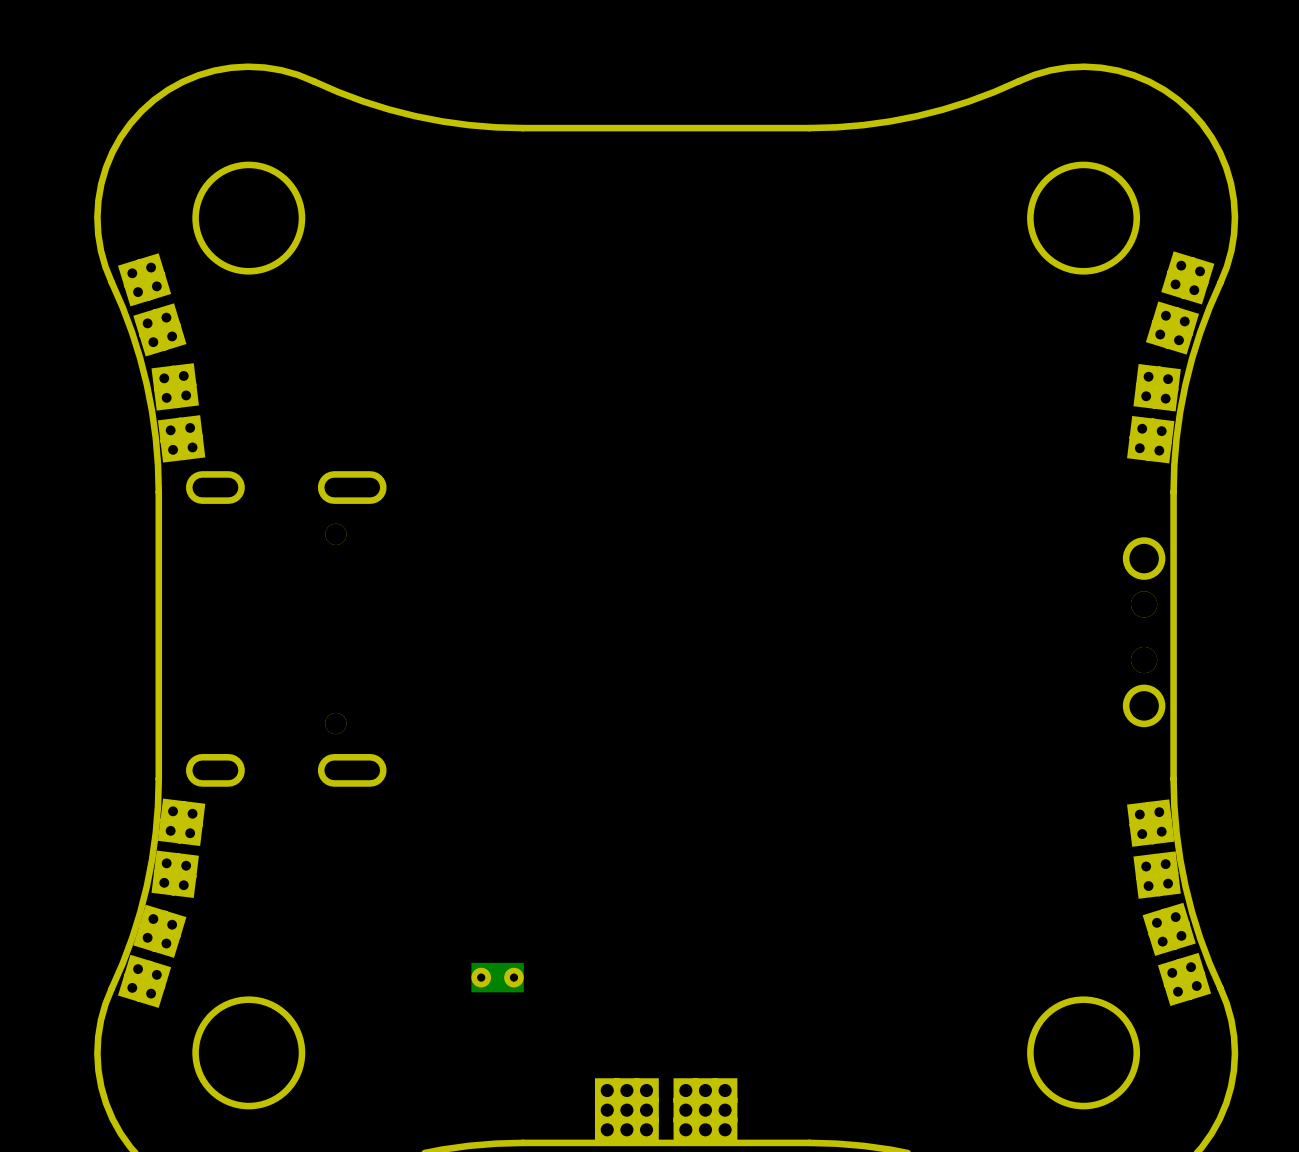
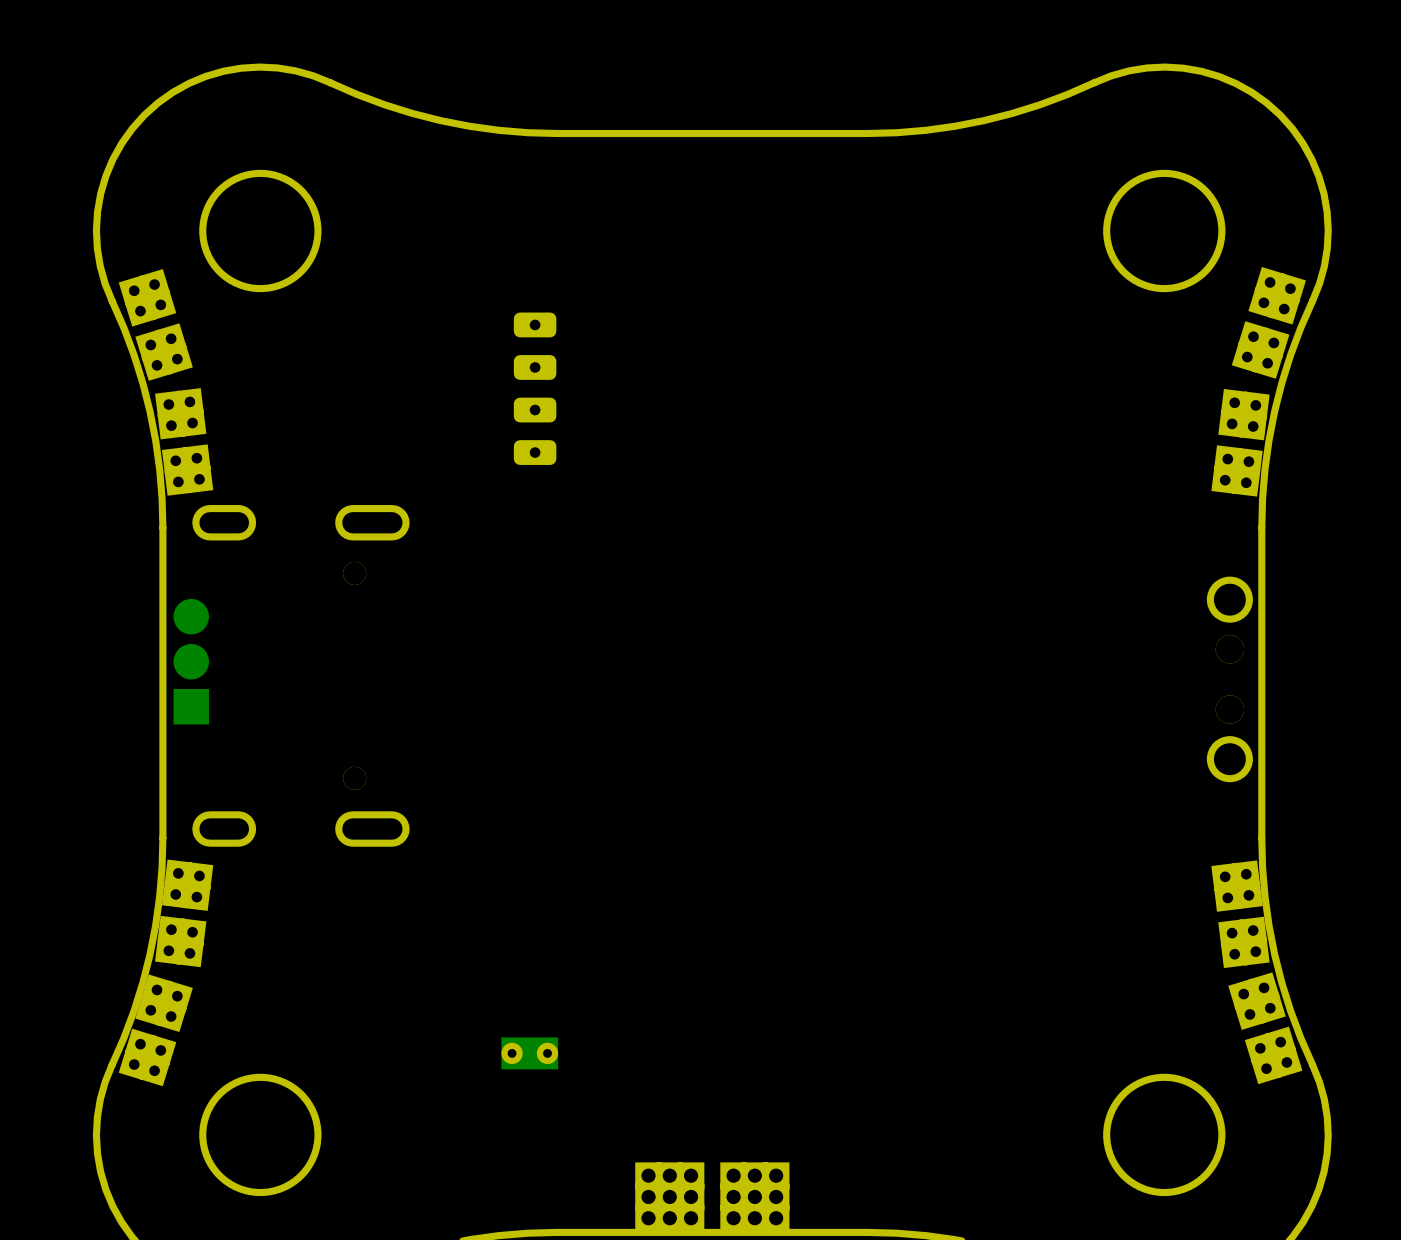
part: none -> (535, 388)
part: none -> (191, 661)

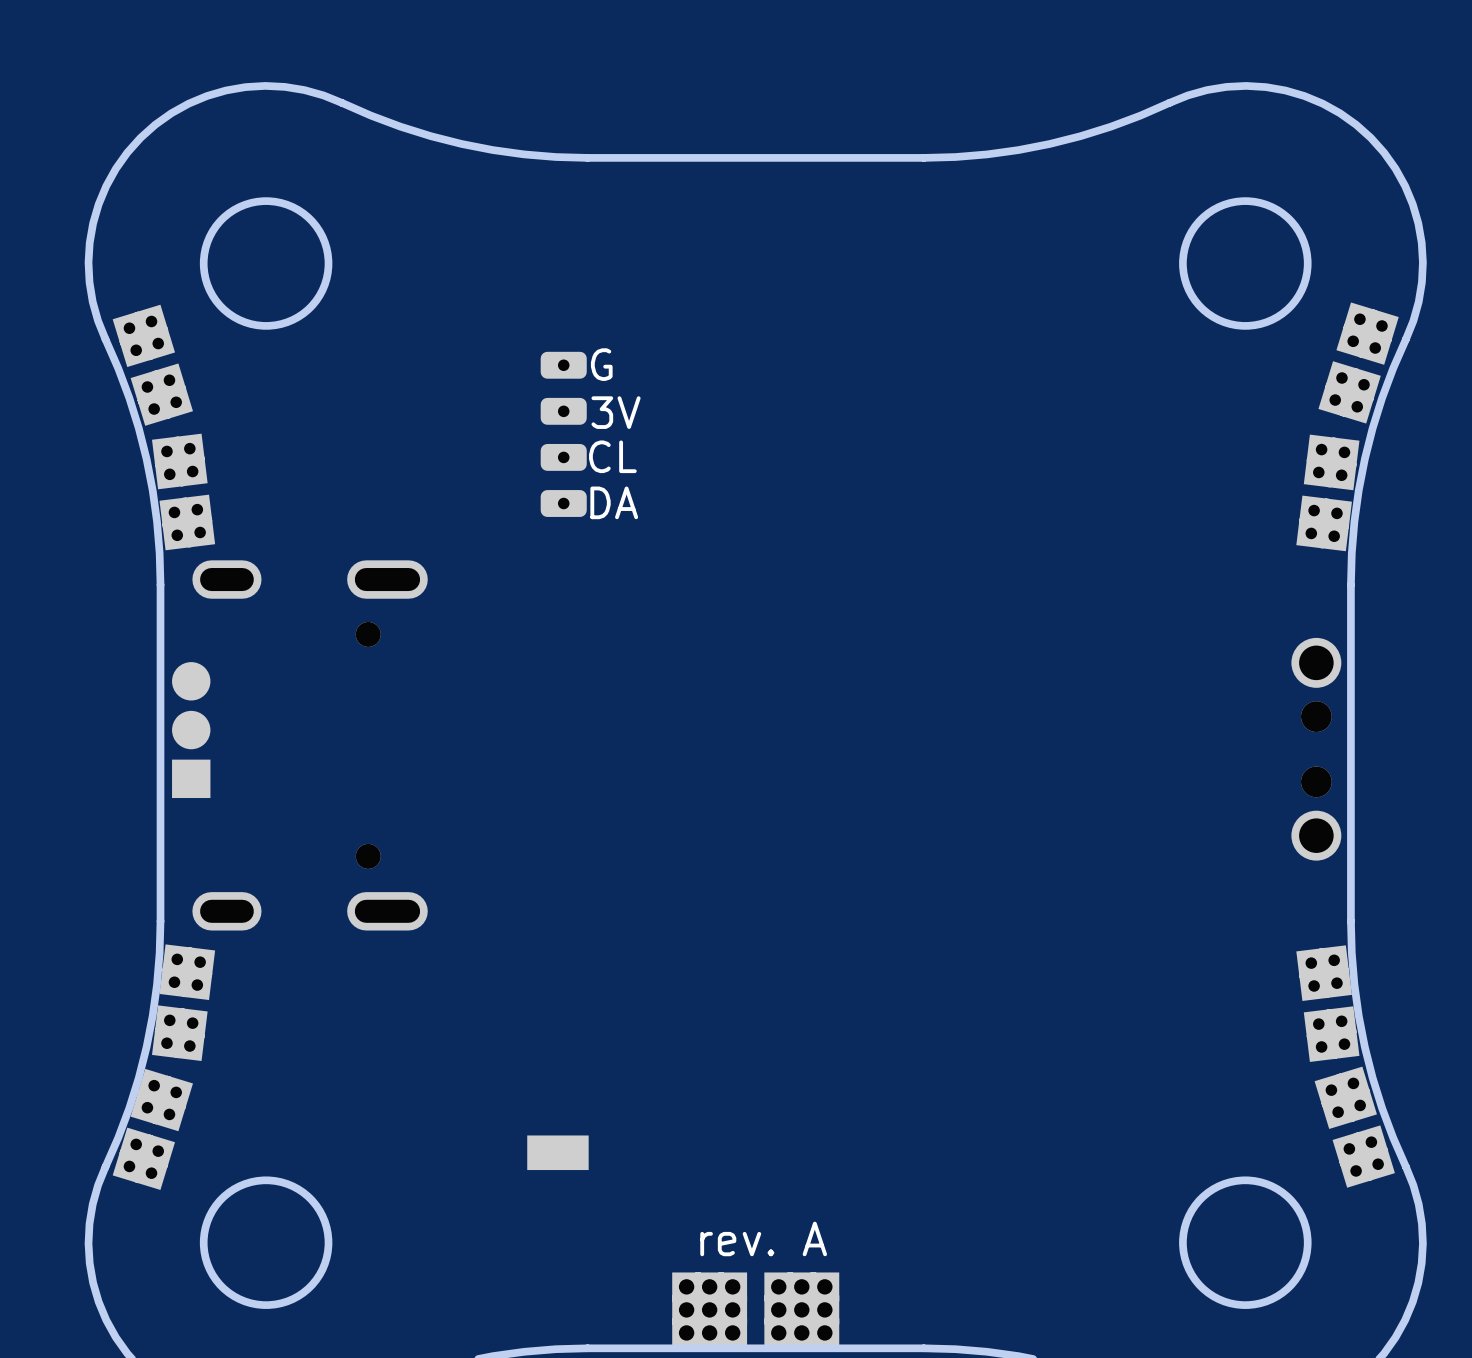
text: none -> G (601, 364)
text: none -> 3V (616, 412)
text: none -> CL (612, 456)
text: none -> DA (614, 502)
part footprint: [501, 1037, 559, 1070] -> [527, 1135, 589, 1171]
text: none -> rev. A (763, 1238)

